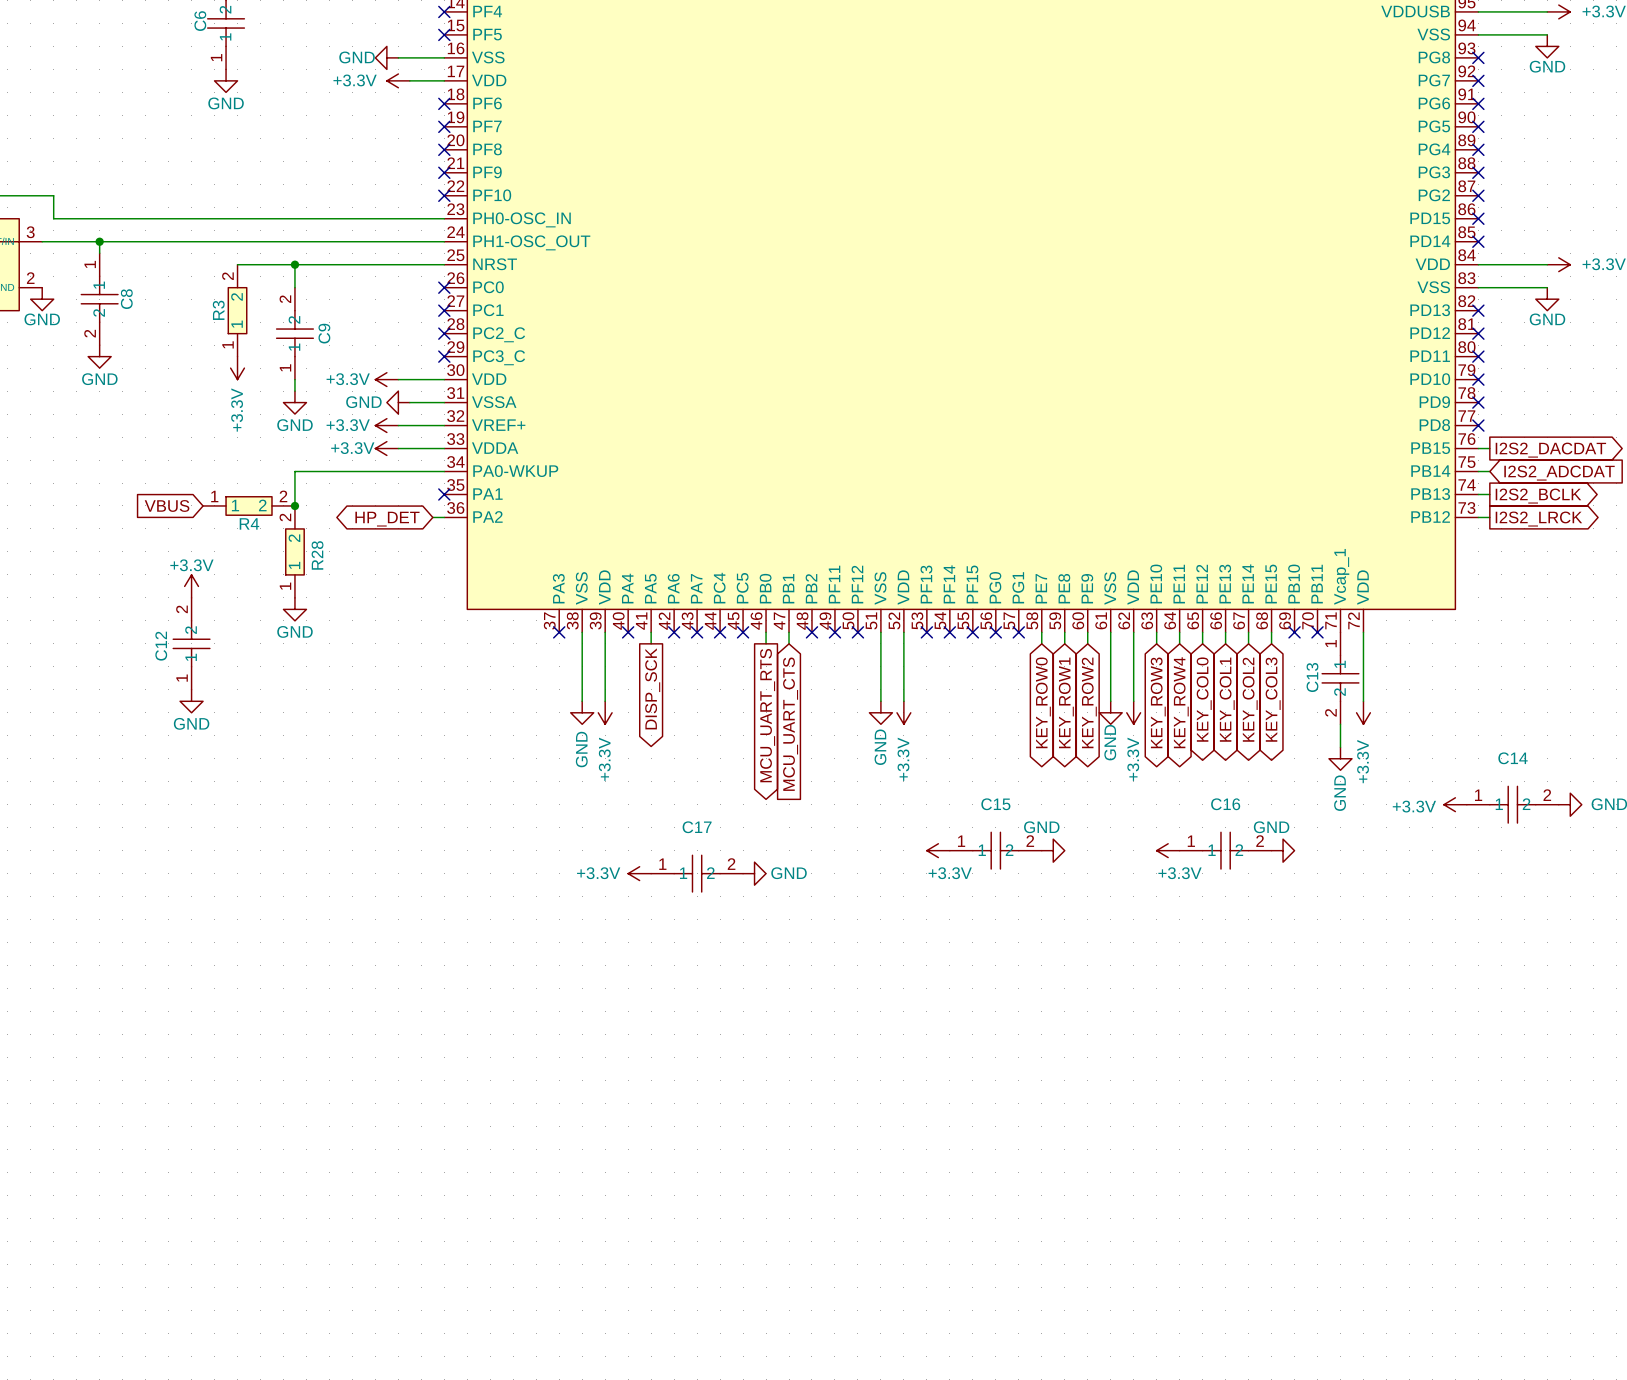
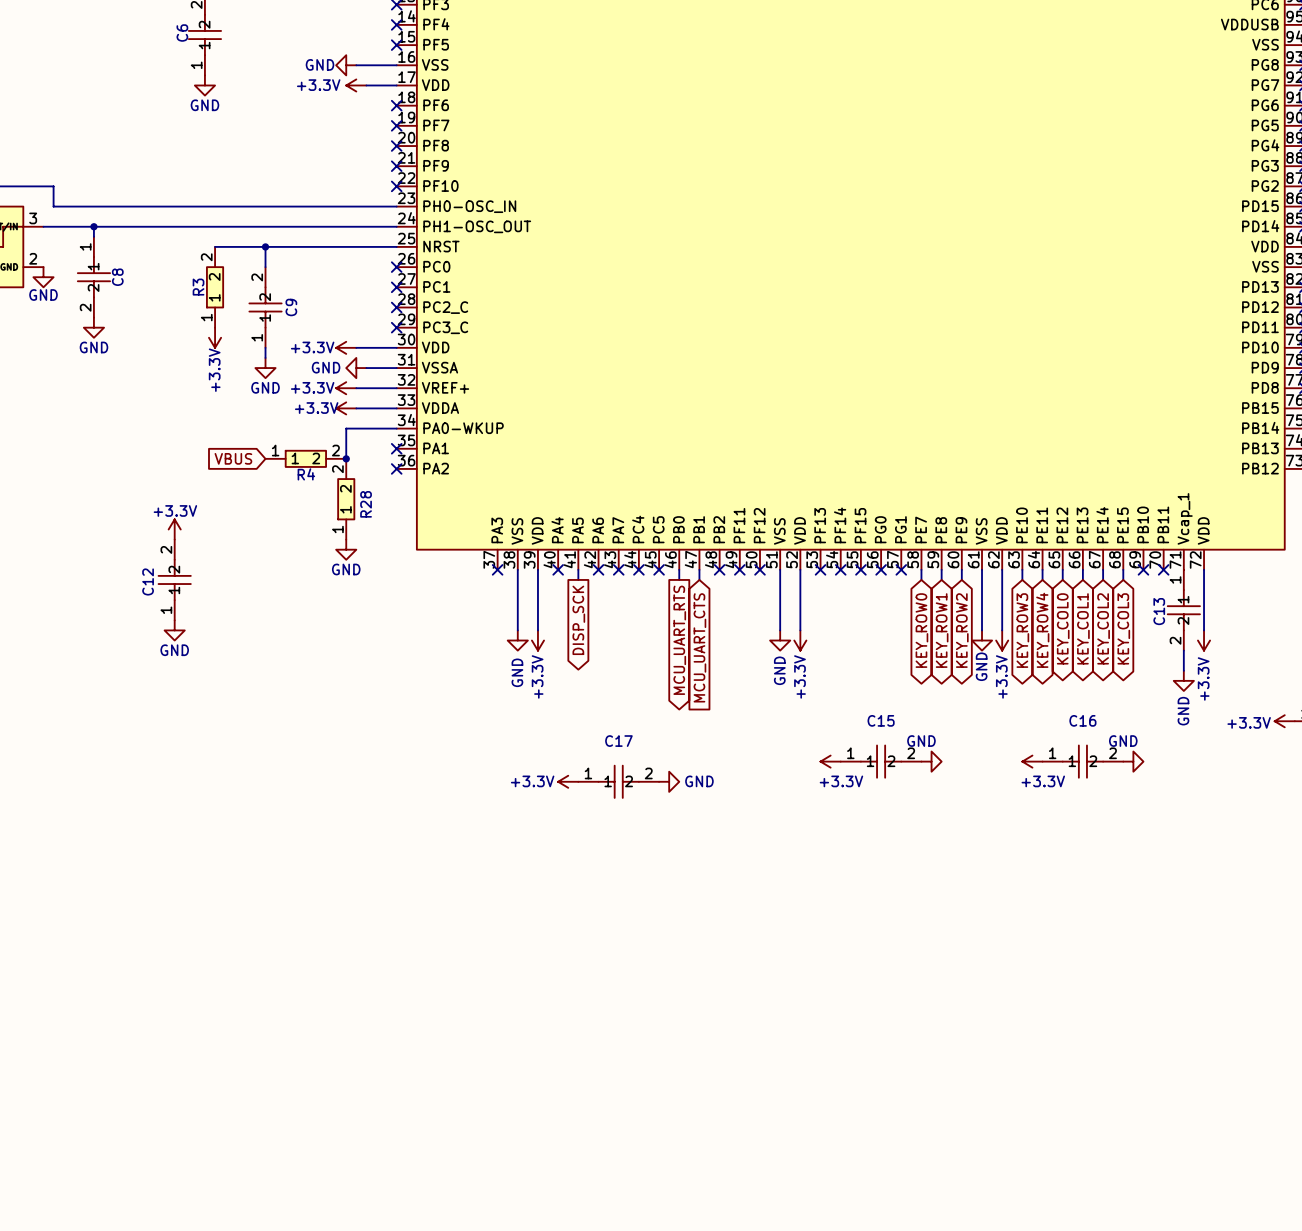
wire: (386, 471) (294, 471) (294, 505) -> (346, 428) (346, 458)
global label position: VBUS (167, 505) -> VBUS (233, 458)
R4 position: (249, 505) -> (305, 458)
junction: (294, 505) -> none
junction: none -> (346, 458)
wire: (432, 517) (444, 517) -> none
no-connect mark: none -> (396, 468)
global label: HP_DET (387, 519) -> none
R28 position: (294, 551) -> (346, 499)
power symbol position: GND (294, 609) -> GND (346, 549)

